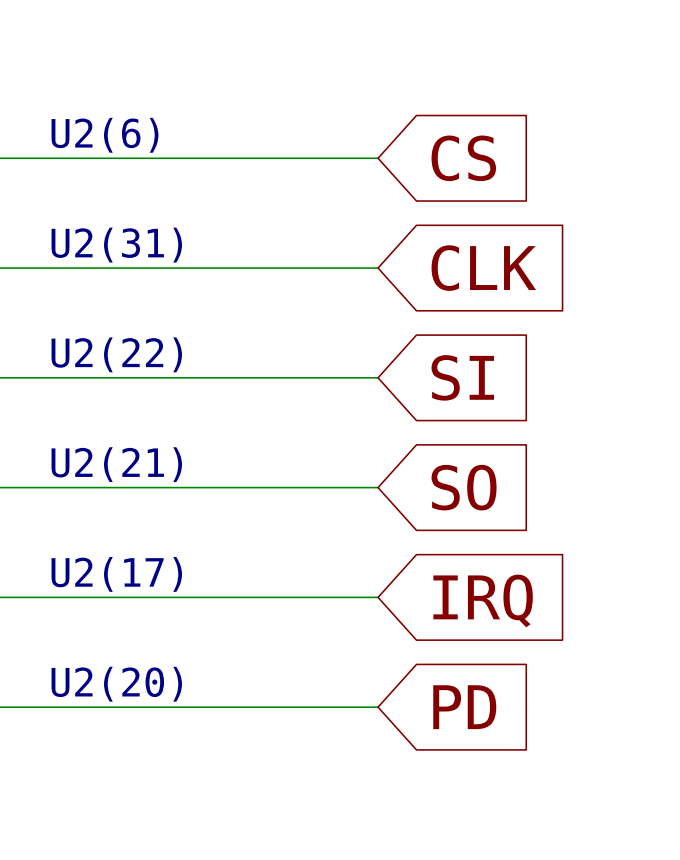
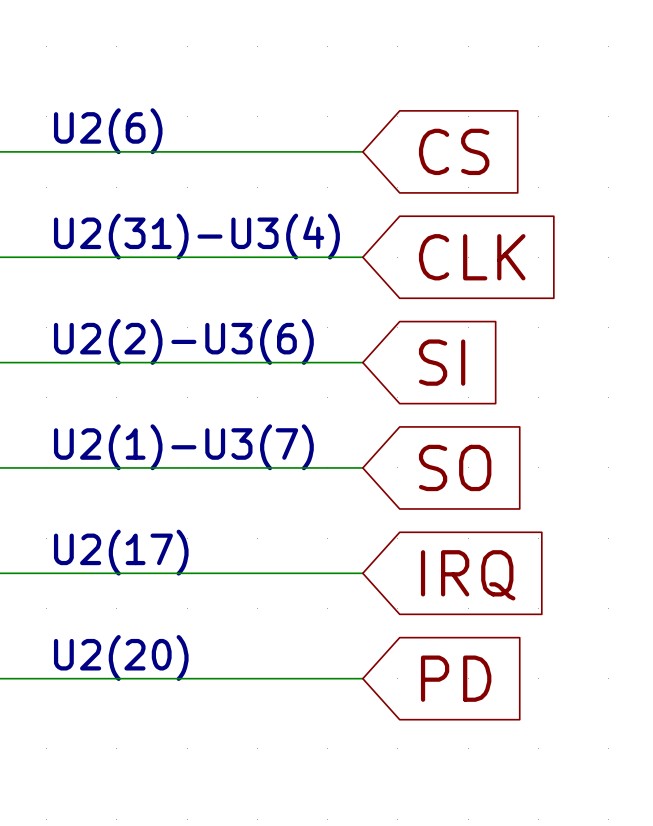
text: U2(31) (116, 245) -> U2(31)-U3(4) (196, 236)
text: U2(22) (116, 354) -> U2(2)-U3(6) (183, 341)
text: U2(21) (116, 464) -> U2(1)-U3(7) (183, 447)

